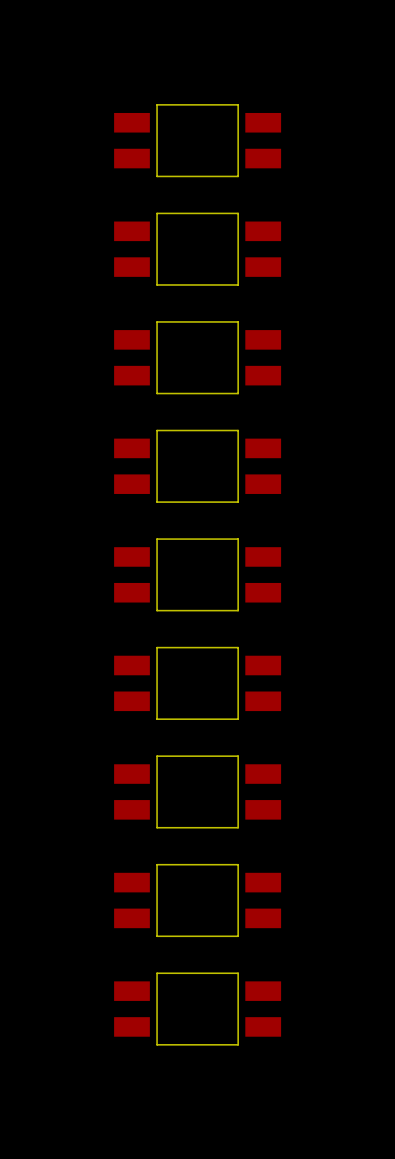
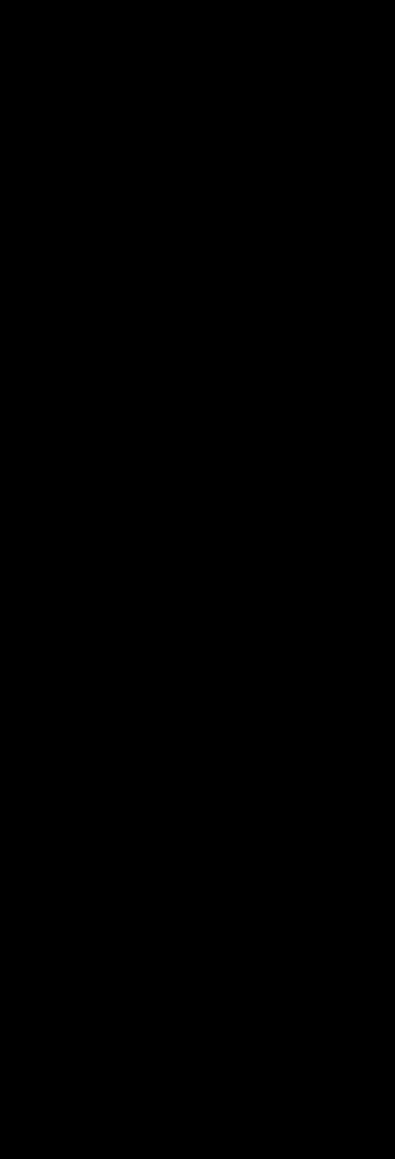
part: (197, 140) -> none
part: (197, 249) -> none
part: (197, 357) -> none
part: (197, 466) -> none
part: (197, 574) -> none
part: (197, 683) -> none
part: (197, 791) -> none
part: (197, 900) -> none
part: (197, 1009) -> none

